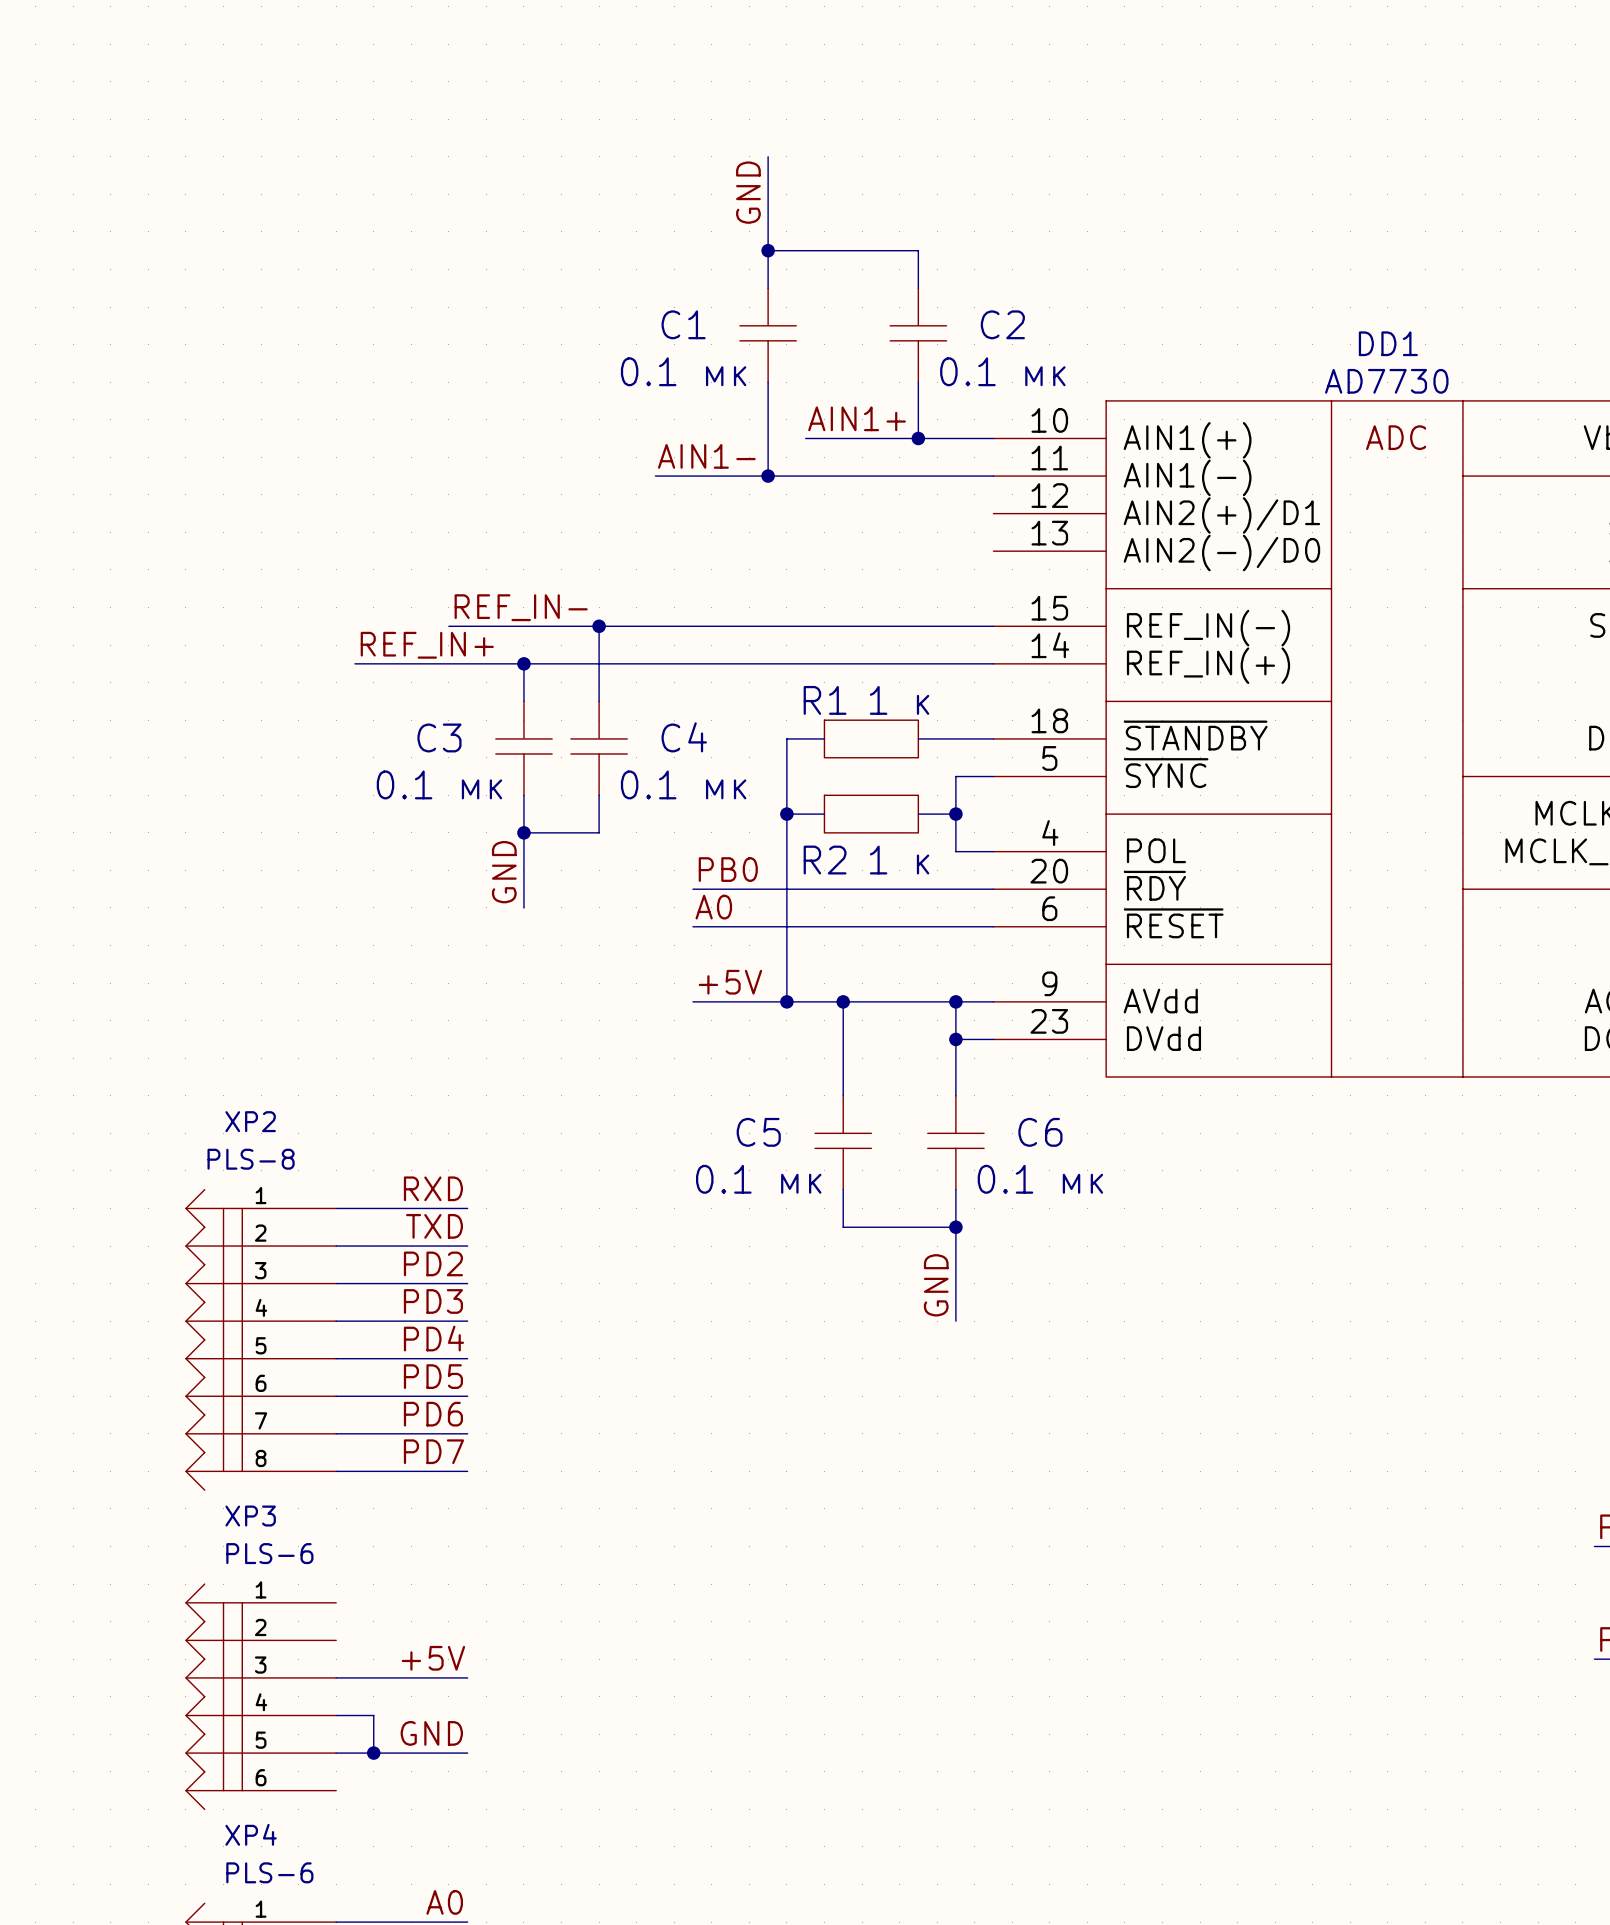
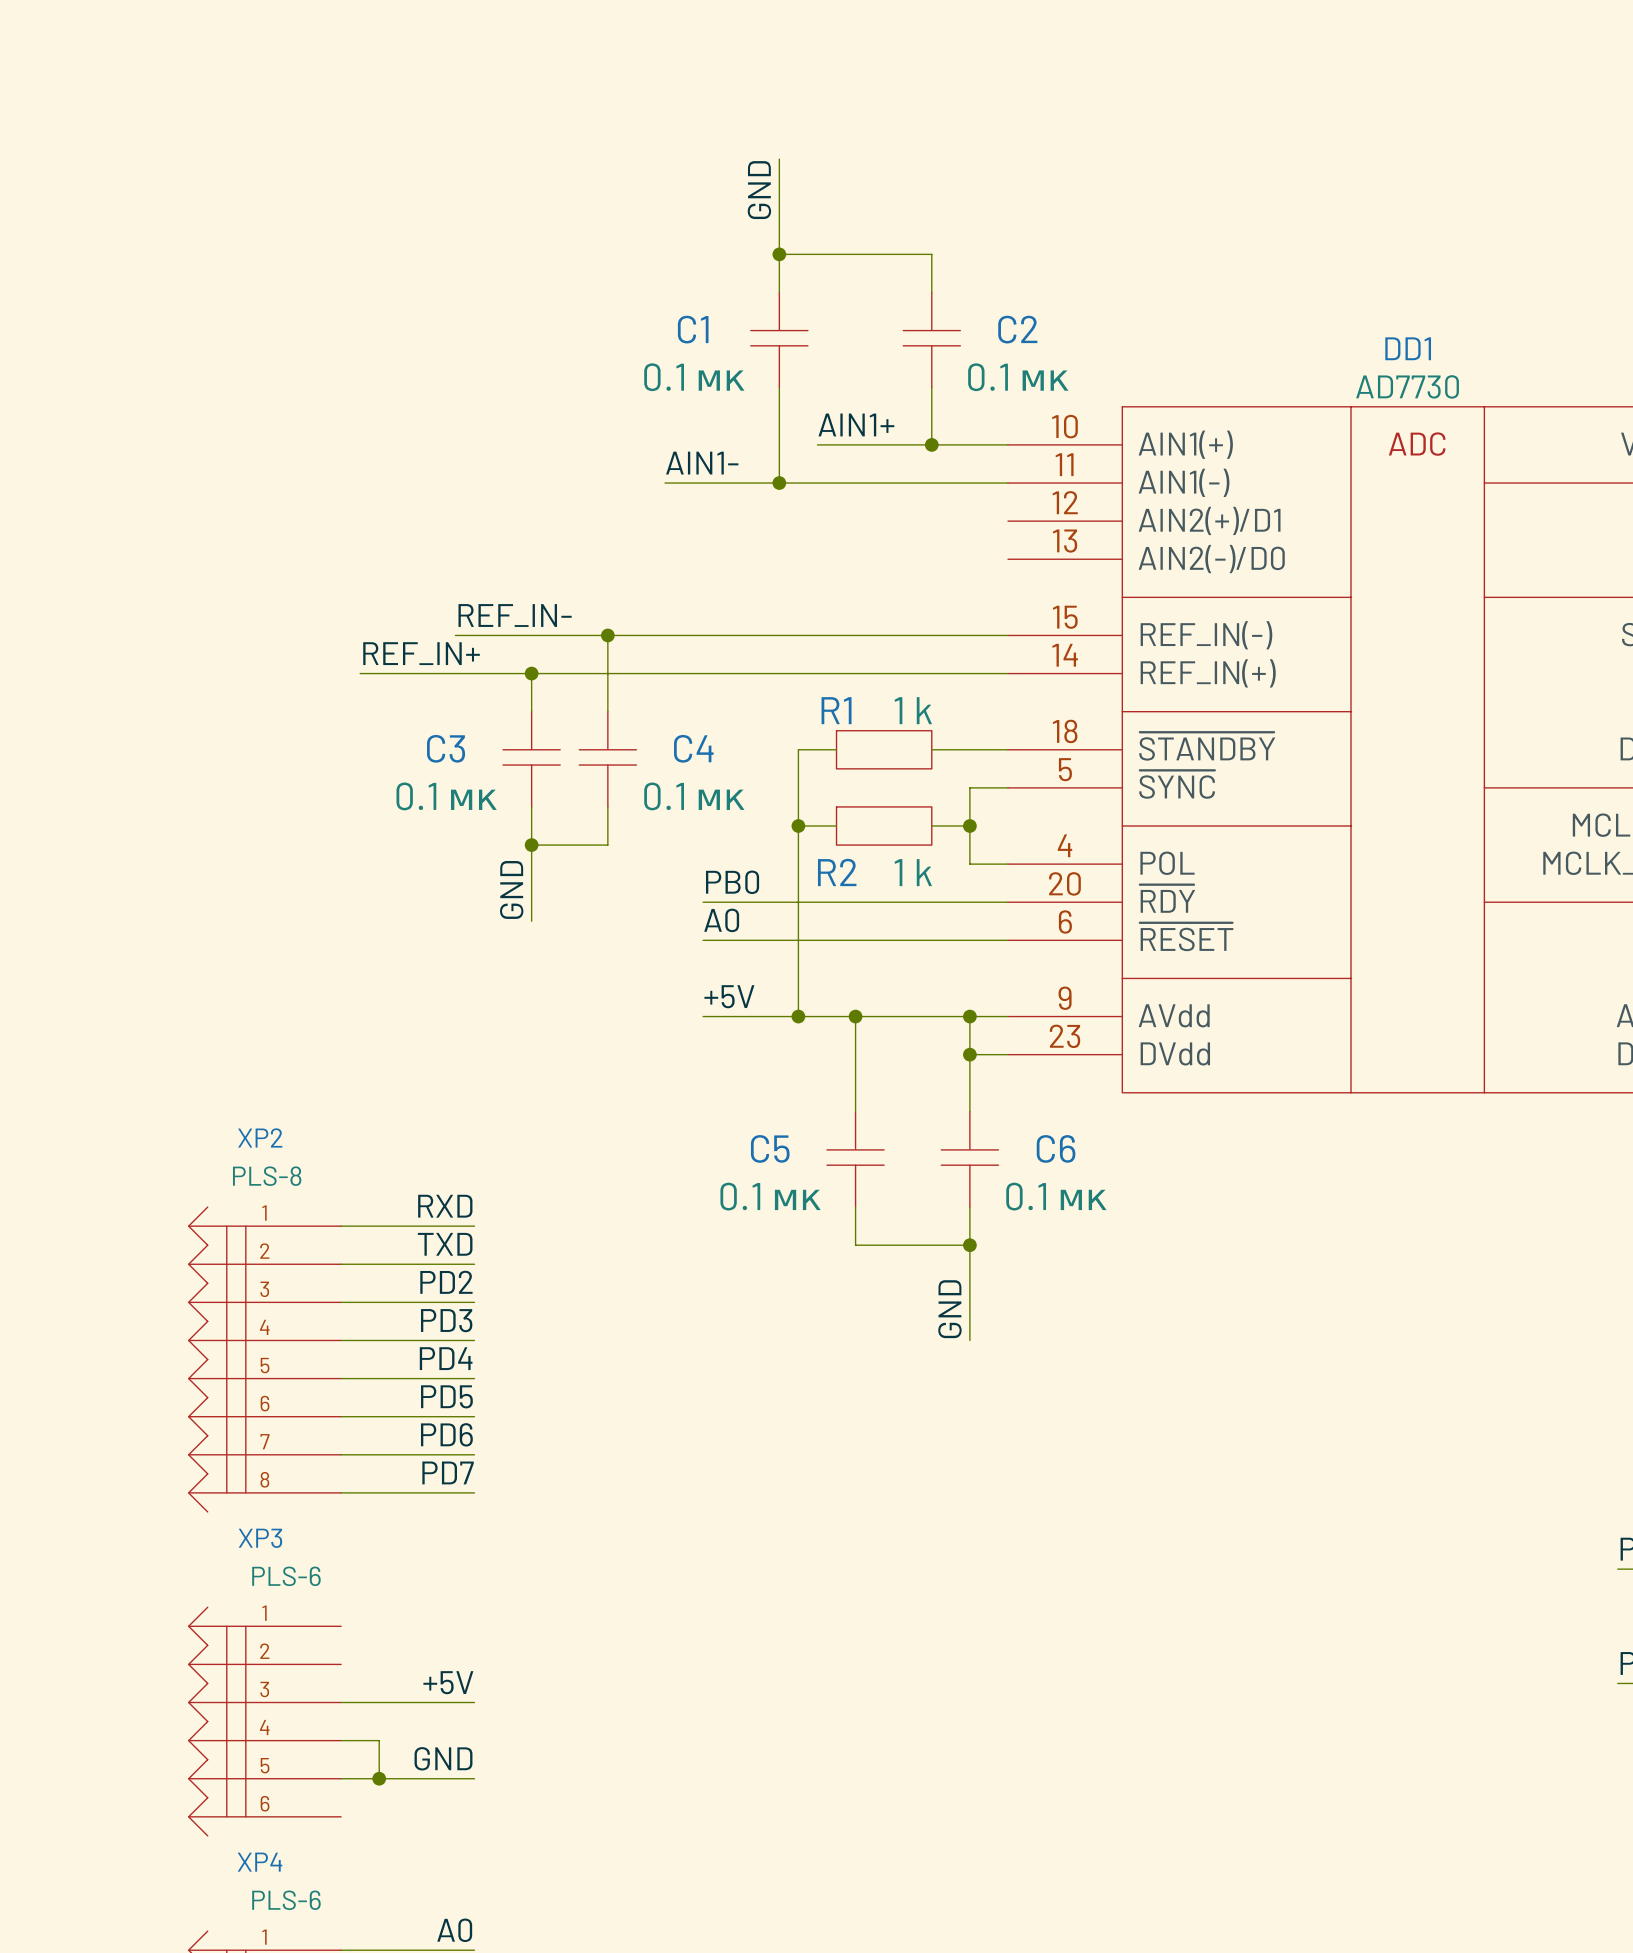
R1 value: 1 к (899, 700) -> 1 k (913, 710)
R2 value: 1 к (899, 860) -> 1 k (913, 872)

